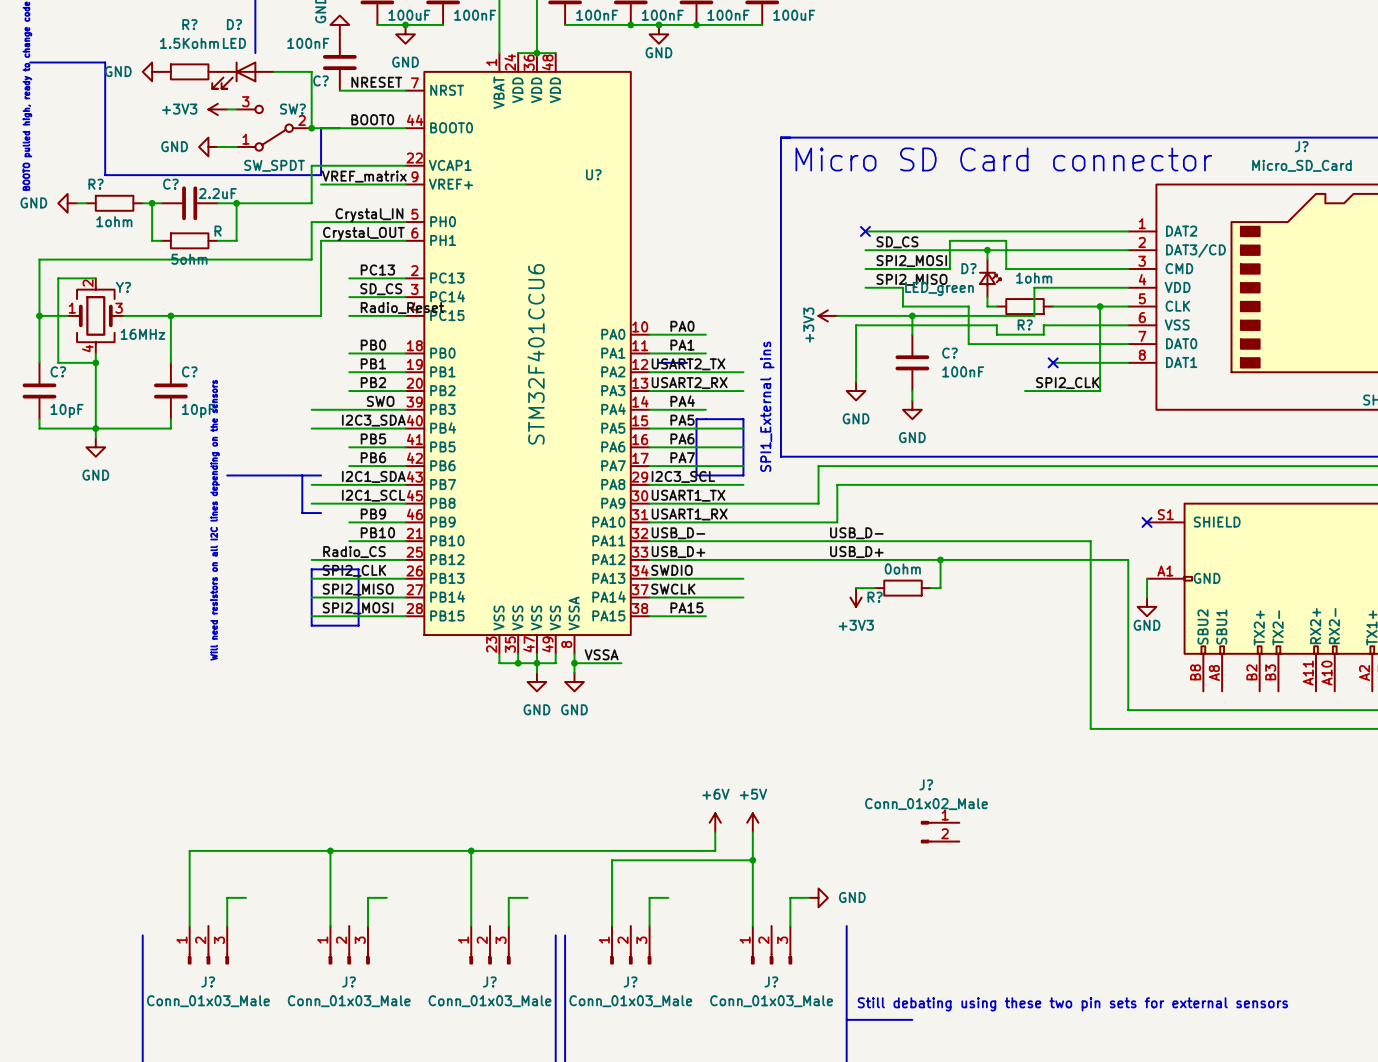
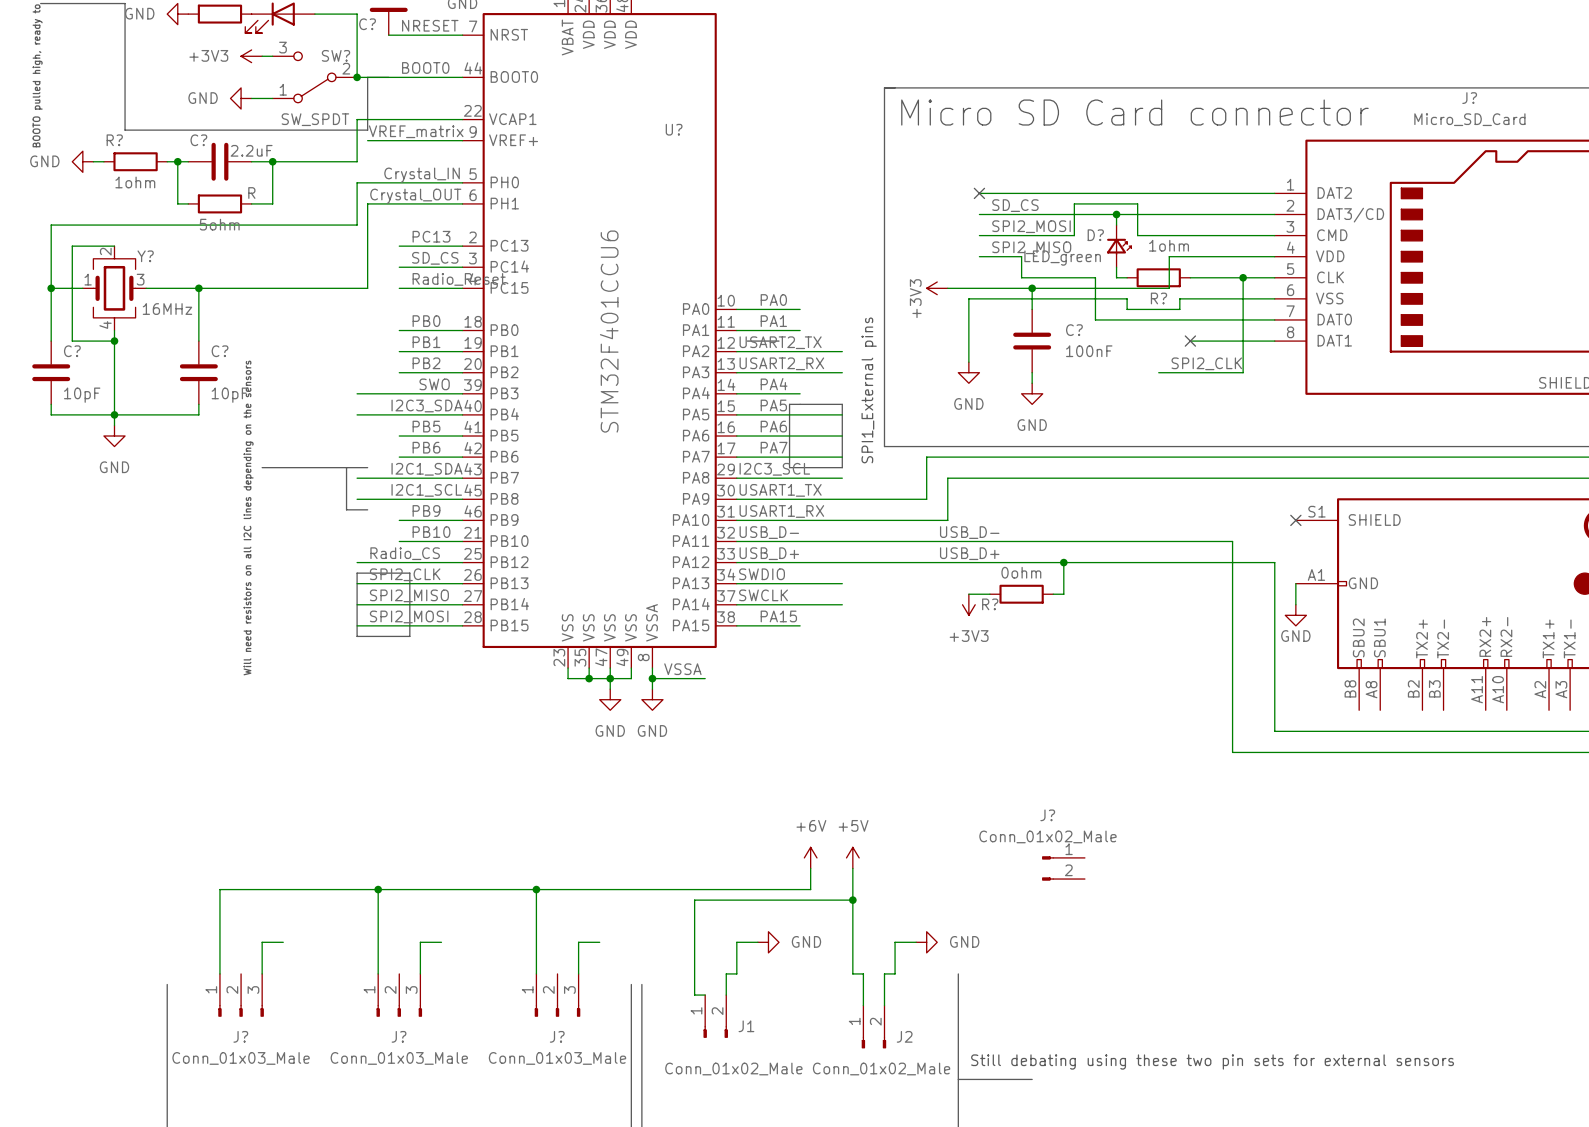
power symbol: none -> GND (768, 942)
wire: none -> (736, 973) (726, 973) (726, 995)
wire: none -> (852, 973) (863, 973) (863, 1005)
wire: none -> (895, 973) (884, 973) (884, 1005)
J?: Conn_01x03_Male (630, 945) -> none
J?: Conn_01x03_Male (771, 945) -> none
J1: none -> Conn_01x02_Male (715, 1016)
J2: none -> Conn_01x02_Male (873, 1027)

